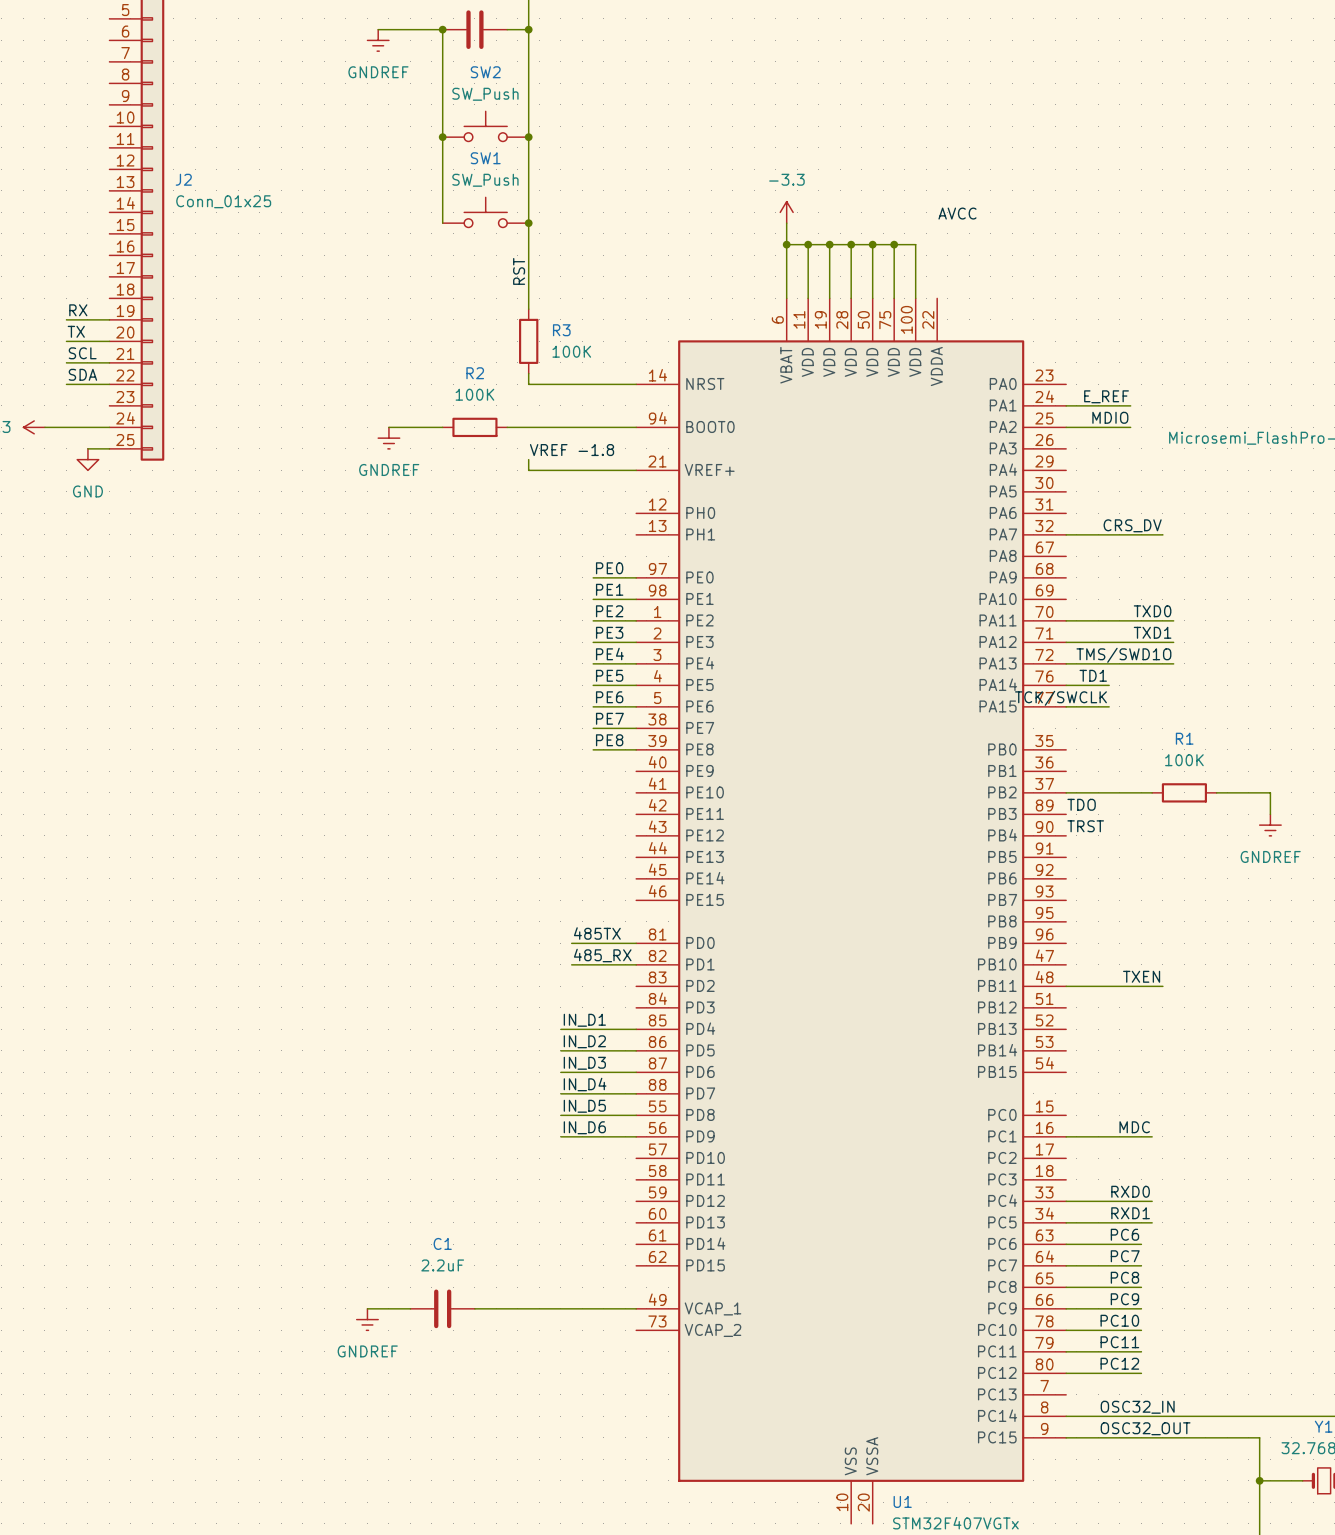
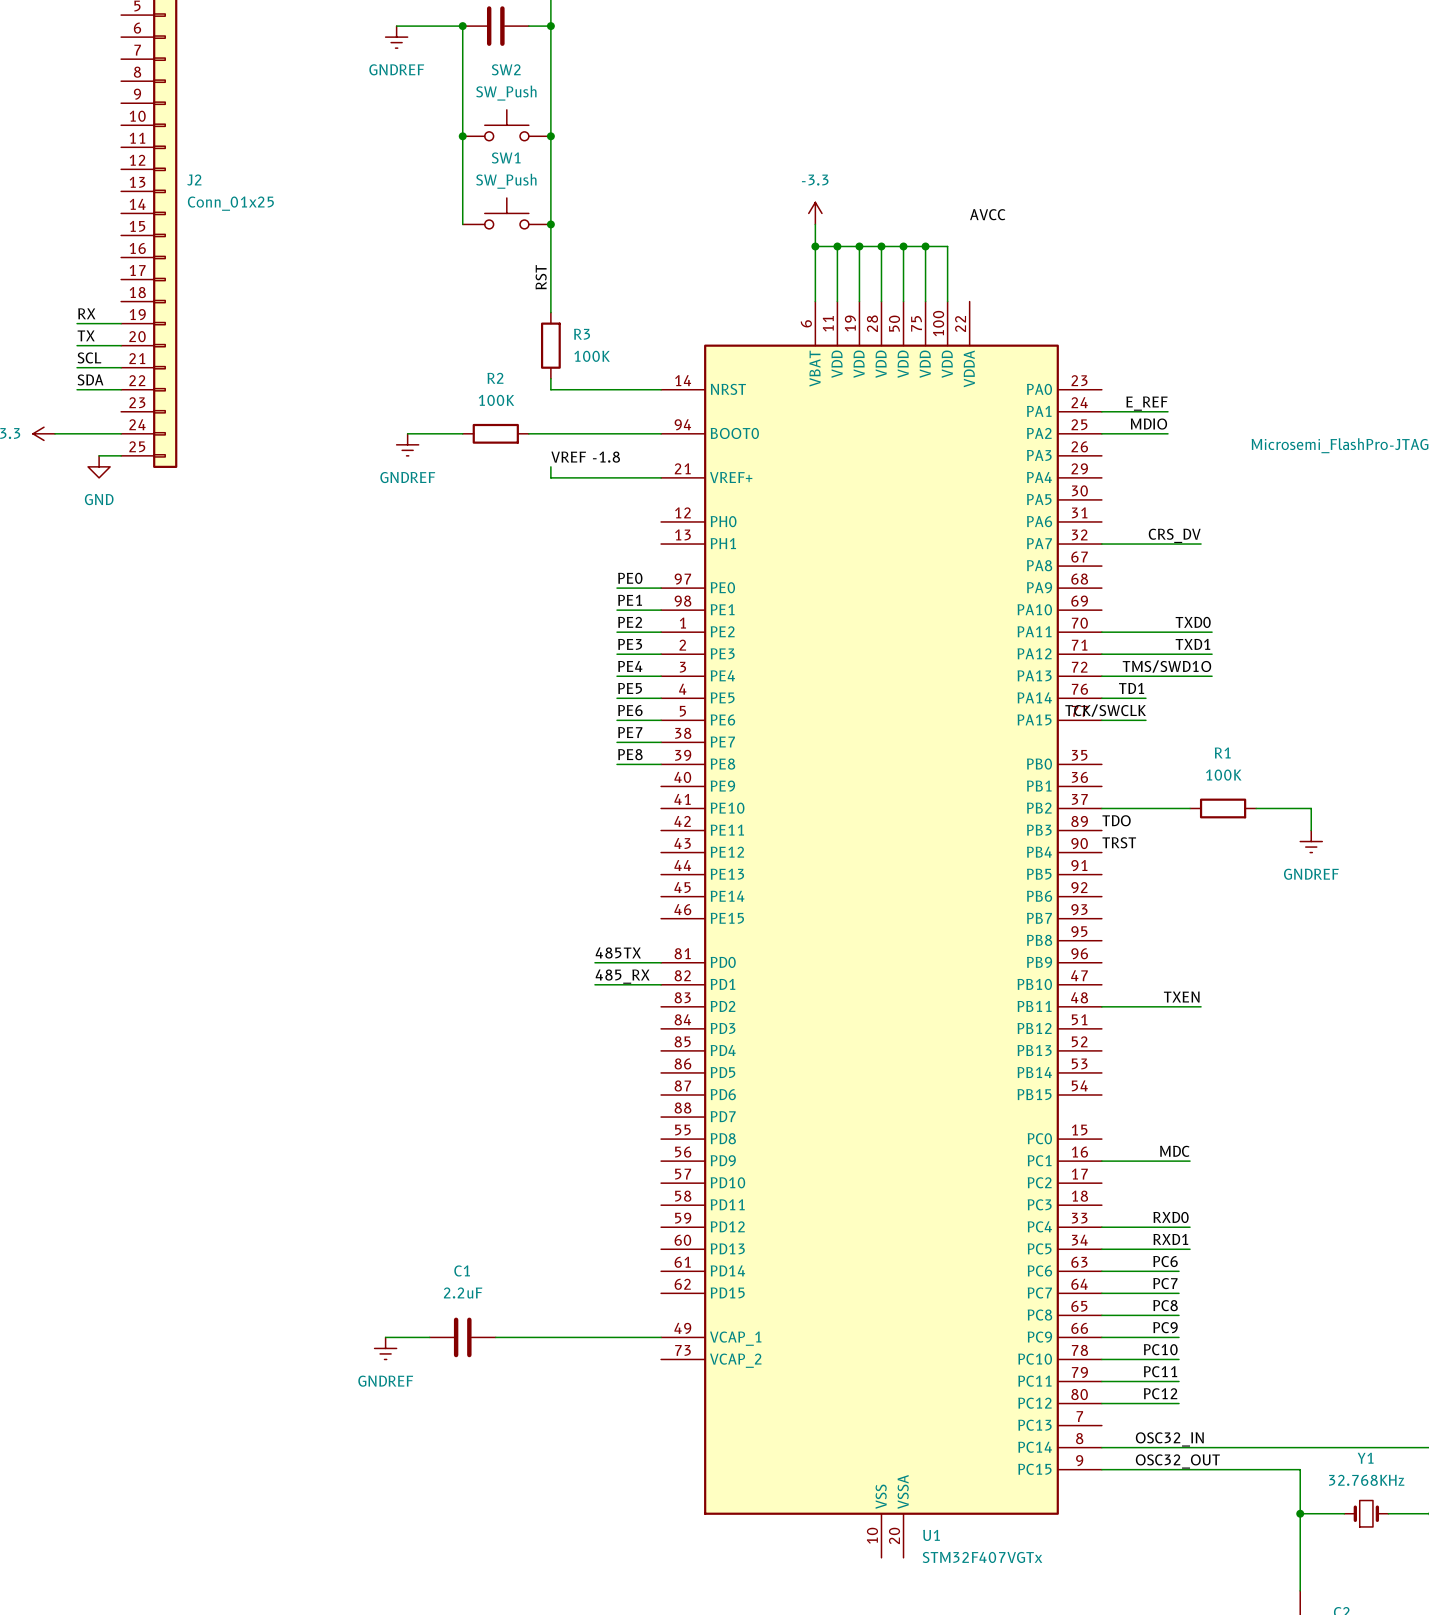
label: IN_D1 (584, 1020) -> none
wire: (560, 1029) (636, 1029) -> none
label: IN_D2 (584, 1041) -> none
wire: (560, 1050) (636, 1050) -> none
label: IN_D3 (584, 1063) -> none
wire: (560, 1072) (636, 1072) -> none
label: IN_D4 (585, 1084) -> none
wire: (560, 1093) (636, 1093) -> none
label: IN_D5 (584, 1106) -> none
wire: (560, 1115) (636, 1115) -> none
label: IN_D6 (584, 1127) -> none
wire: (560, 1136) (636, 1136) -> none

